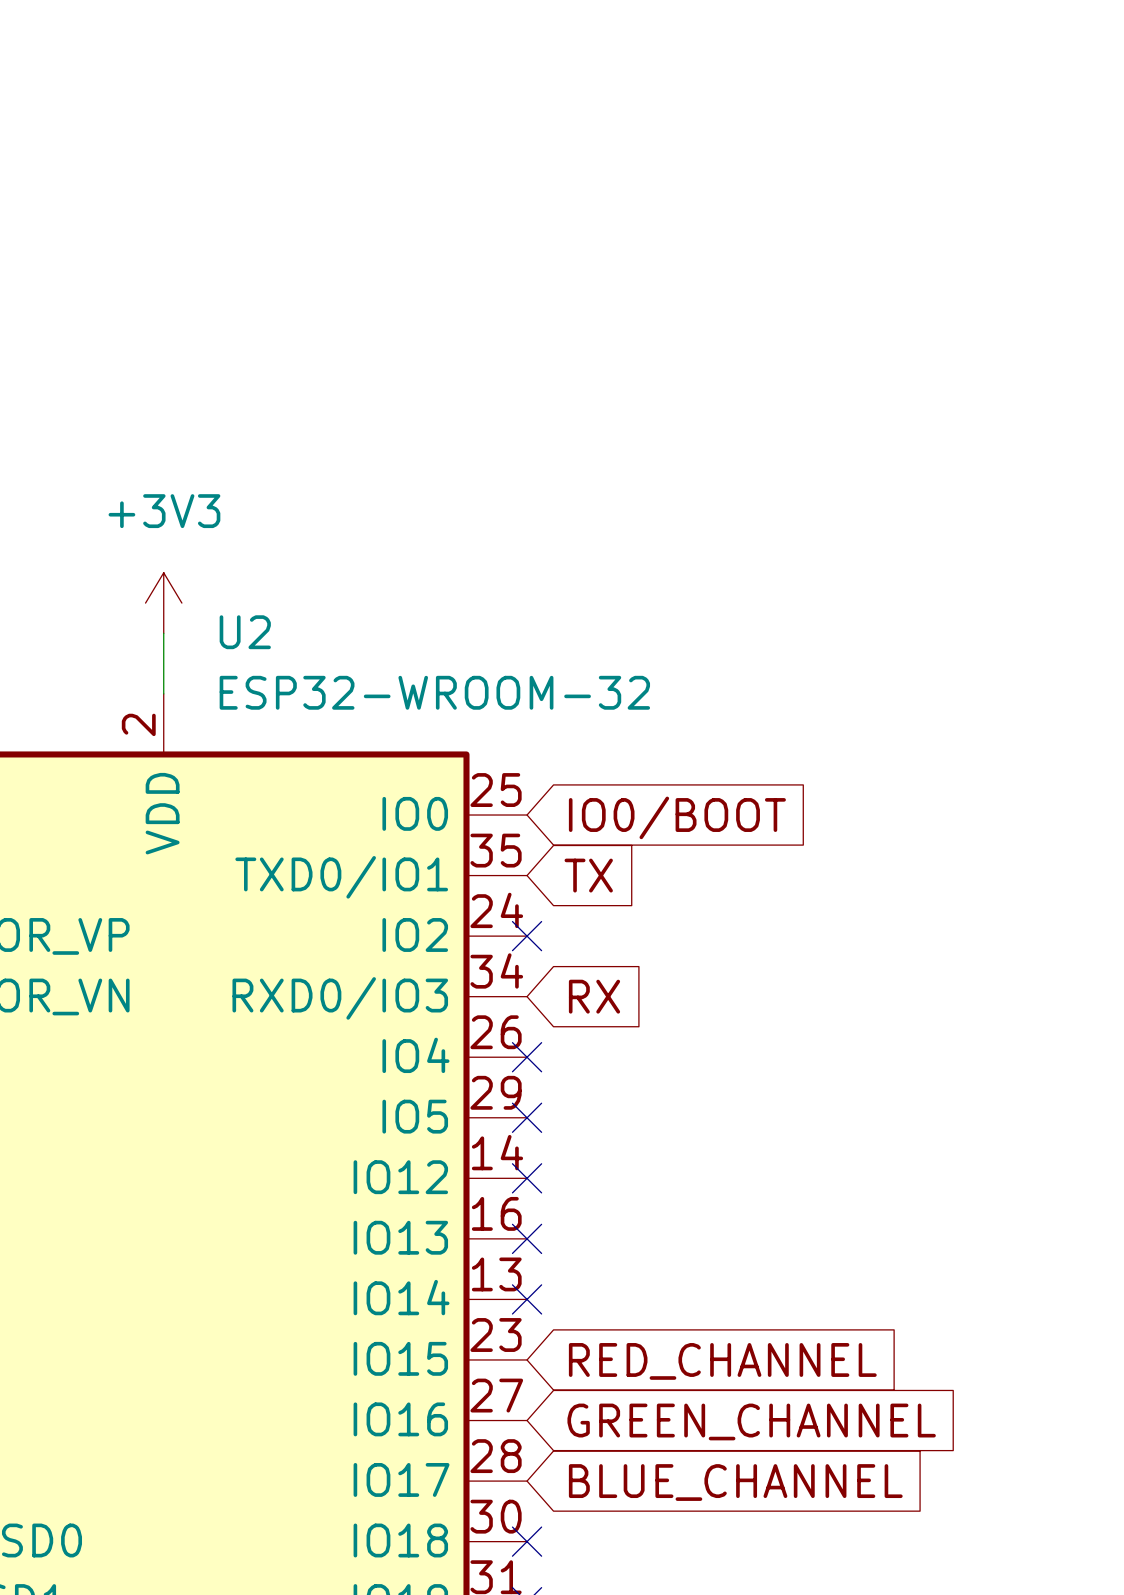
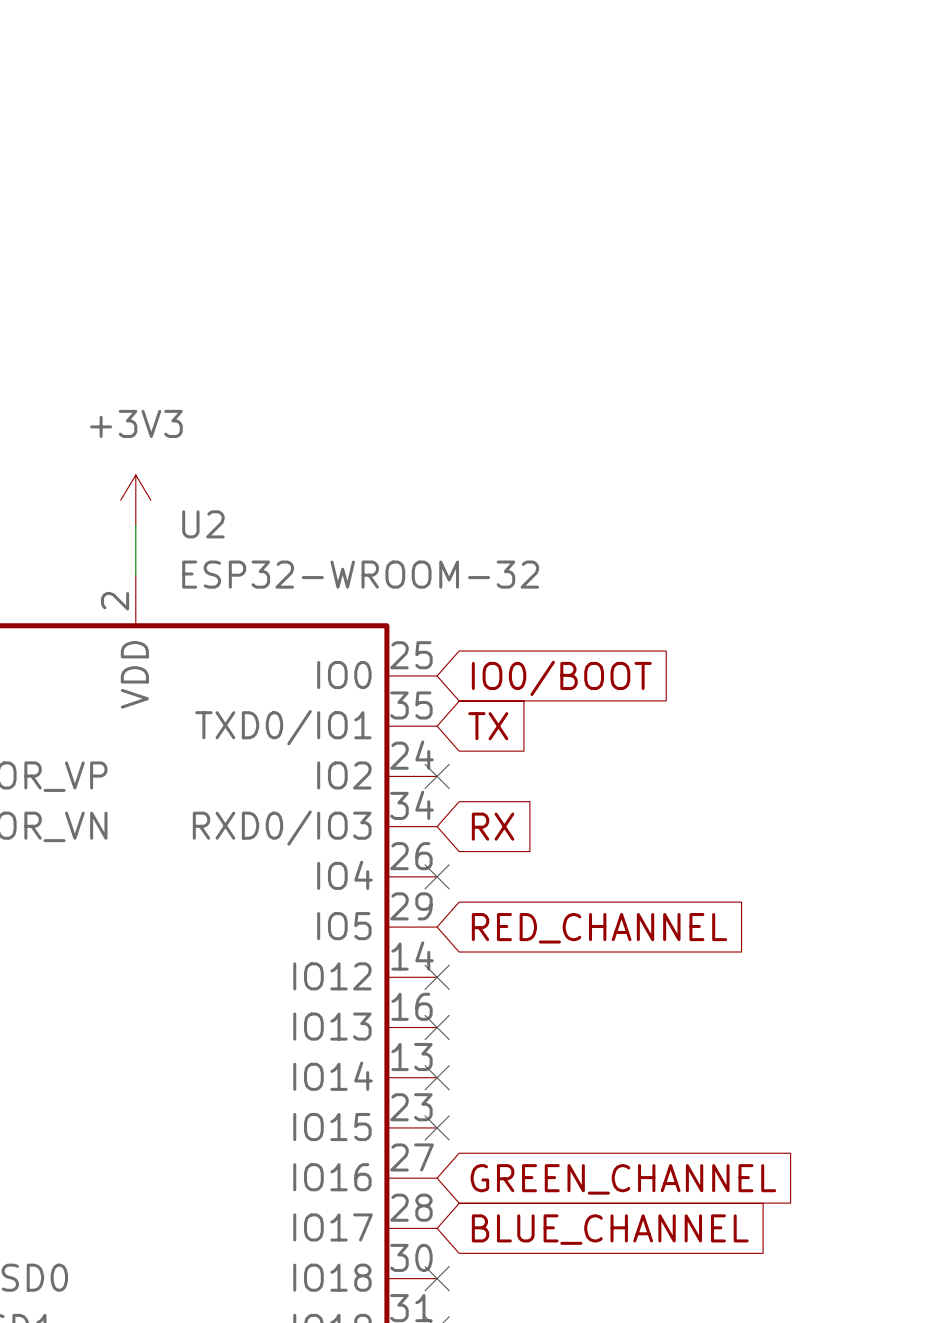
no-connect mark: (527, 1117) -> none
no-connect mark: none -> (437, 1127)
global label position: RED_CHANNEL (722, 1361) -> RED_CHANNEL (599, 928)

